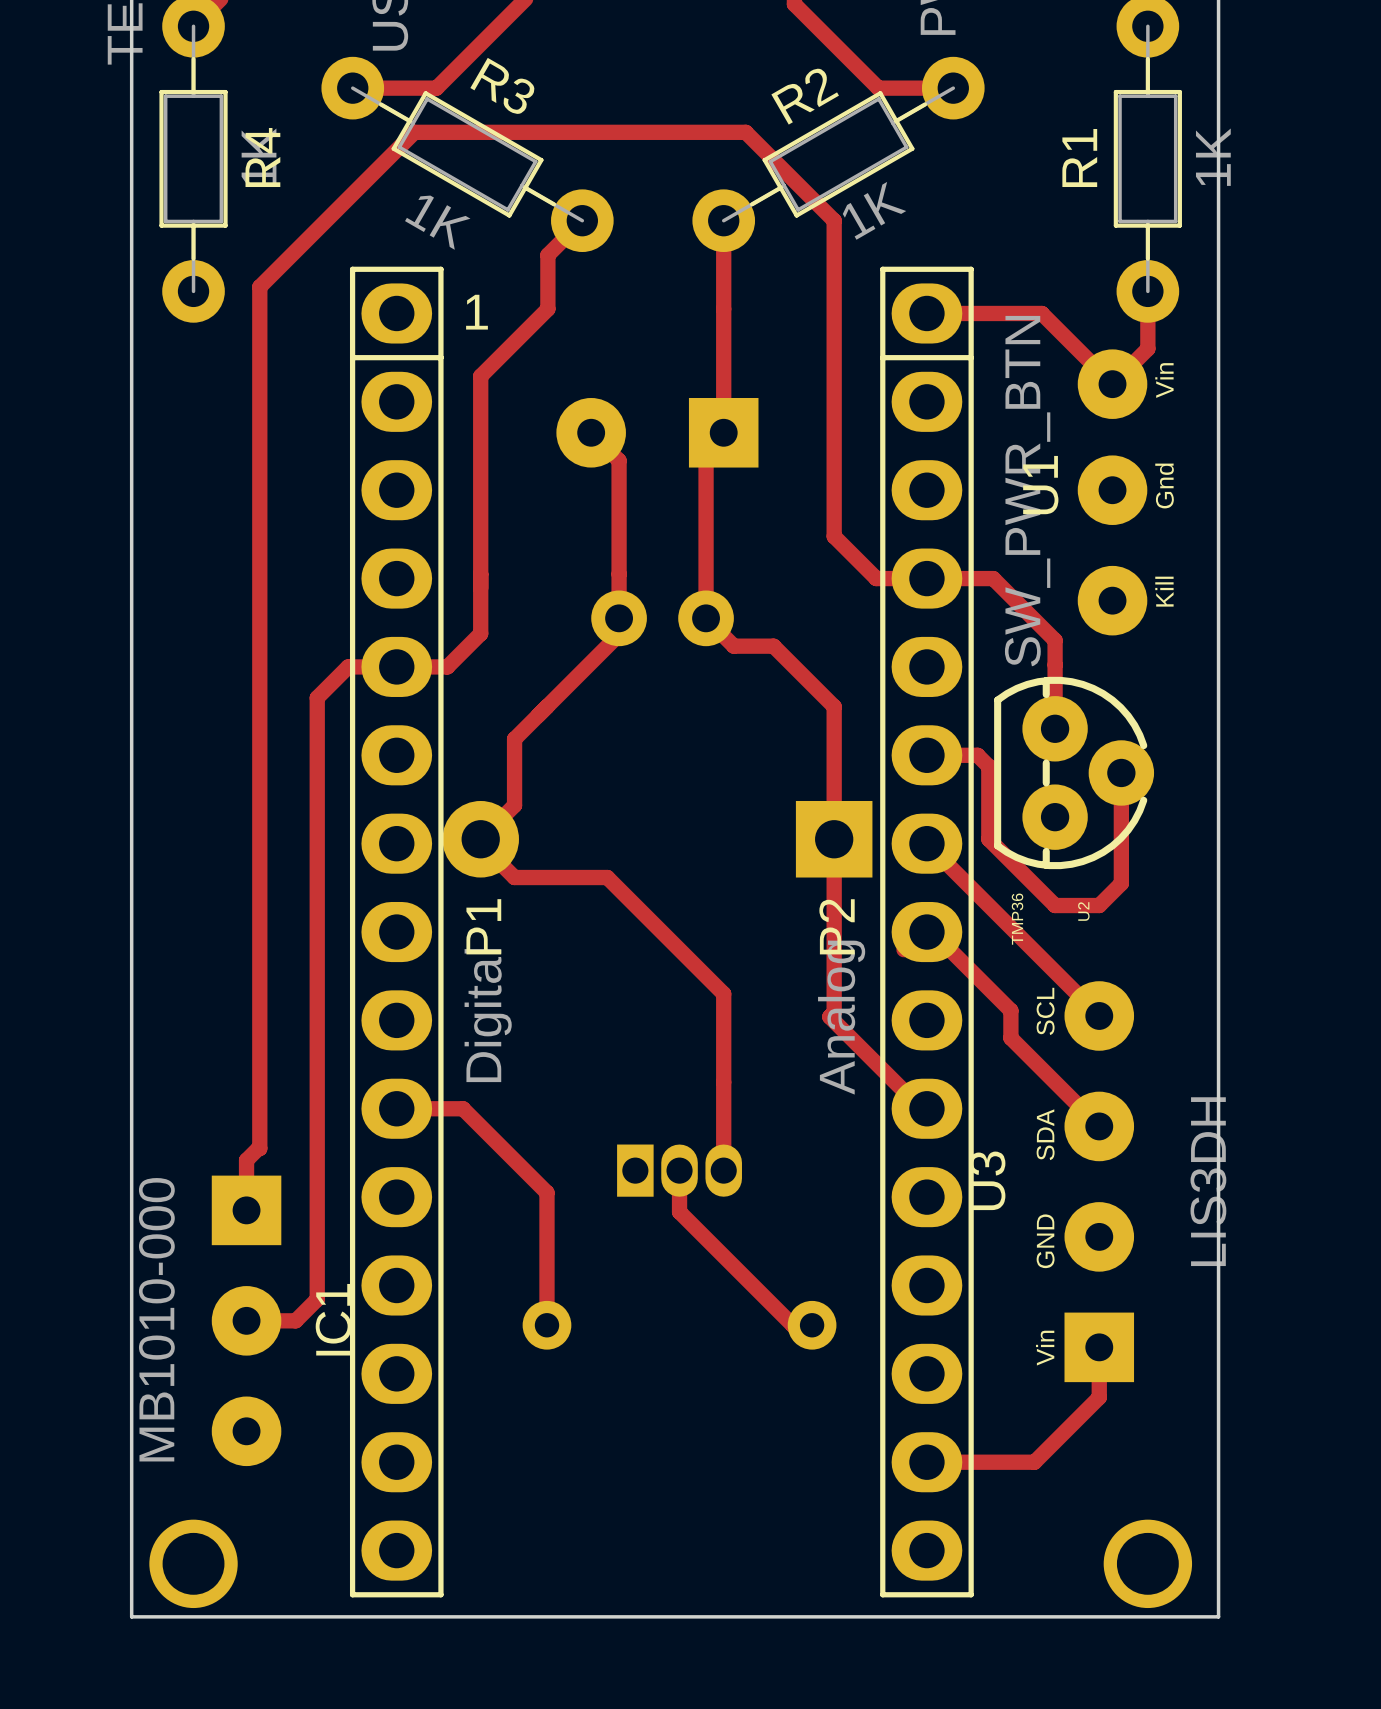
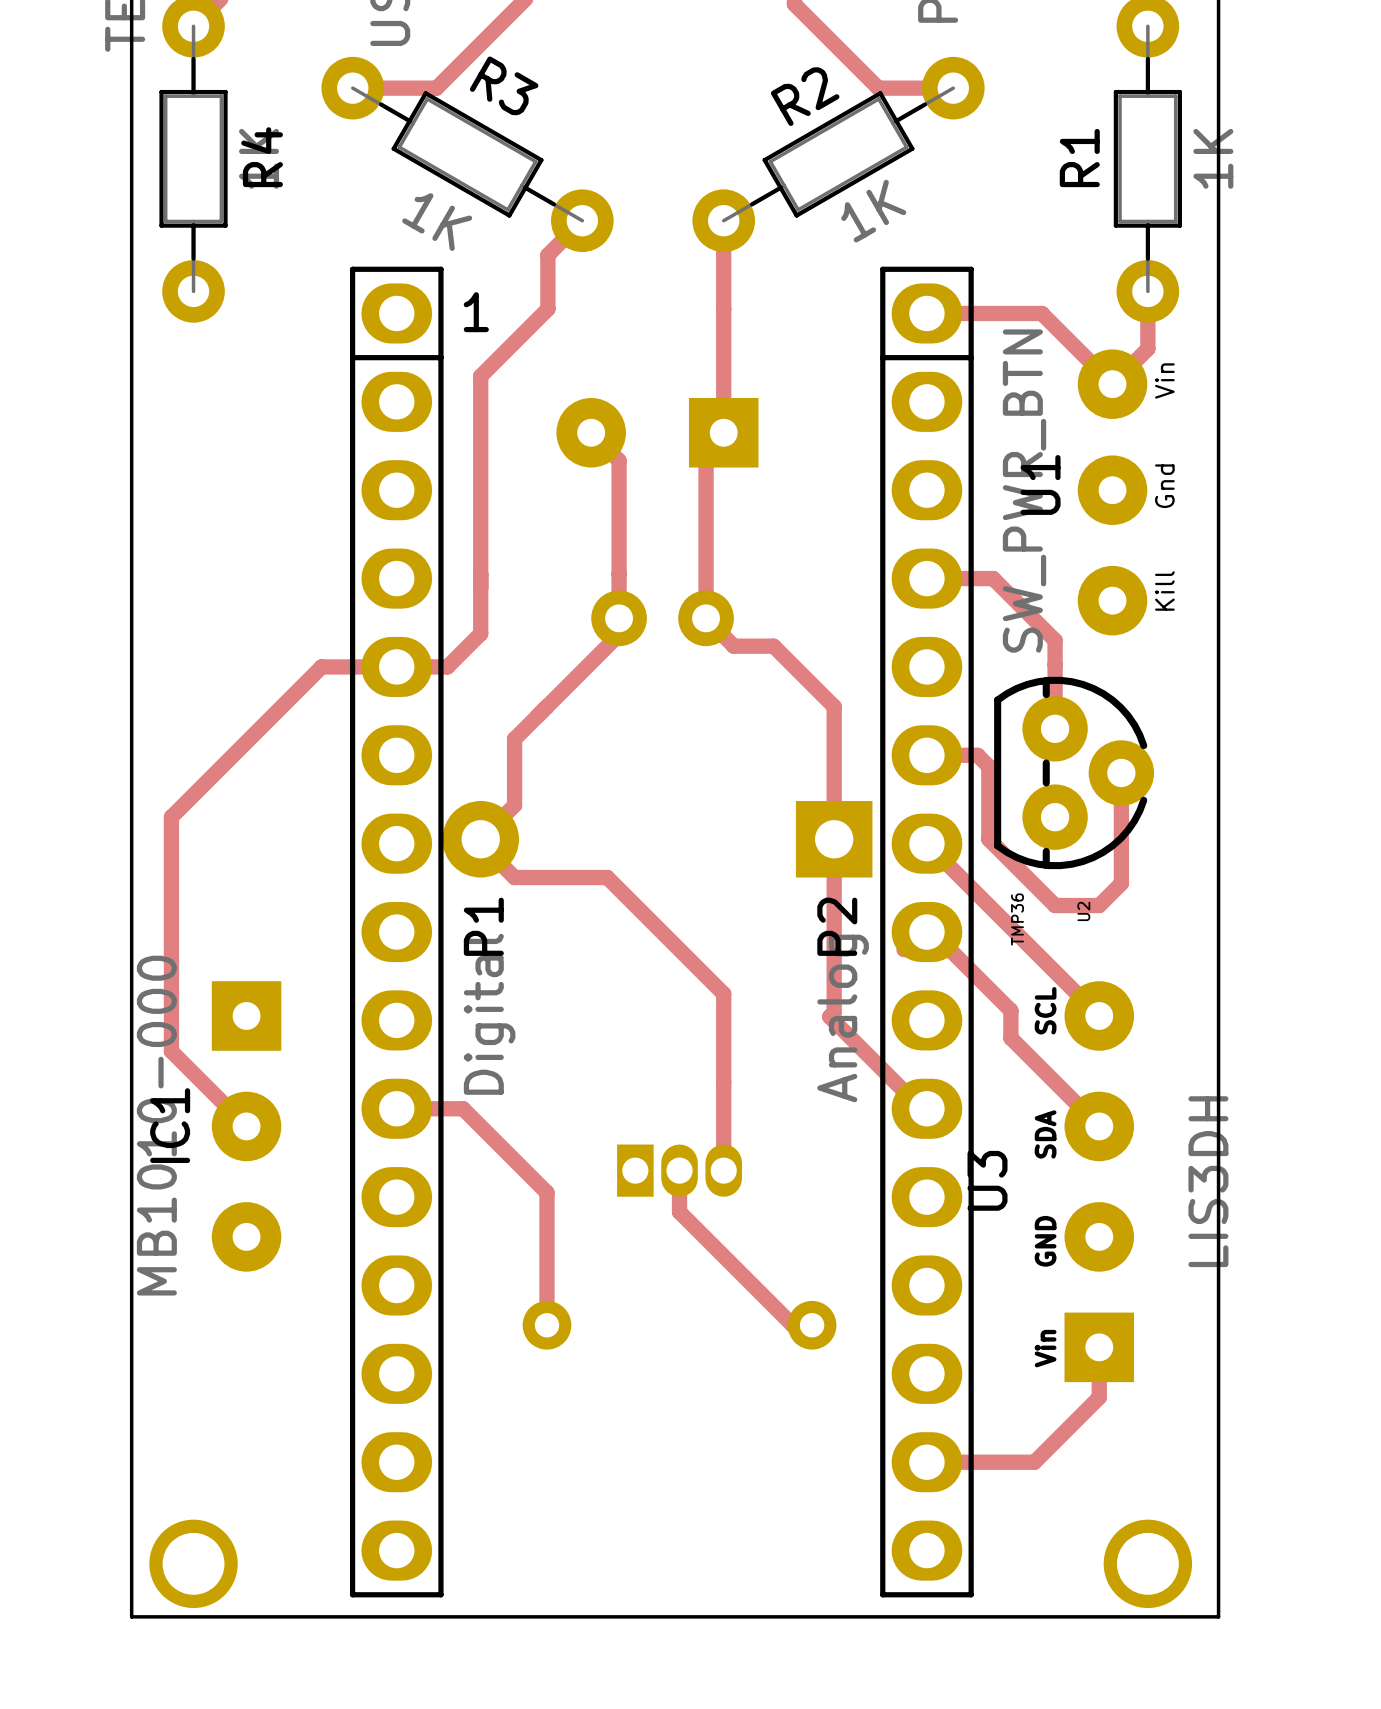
track: (926, 578) (876, 578) (834, 536) (834, 220) (745, 132) (414, 132) (259, 286) (259, 1148) (246, 1160) (246, 1210) -> none
track: (348, 666) (317, 697) (317, 1299) (295, 1320) (246, 1320) -> (348, 666) (321, 666) (171, 817) (171, 1051) (246, 1126)
IC1 name position: IC1 (333, 1319) -> IC1 (170, 1125)
IC1 position: (246, 1320) -> (246, 1126)

